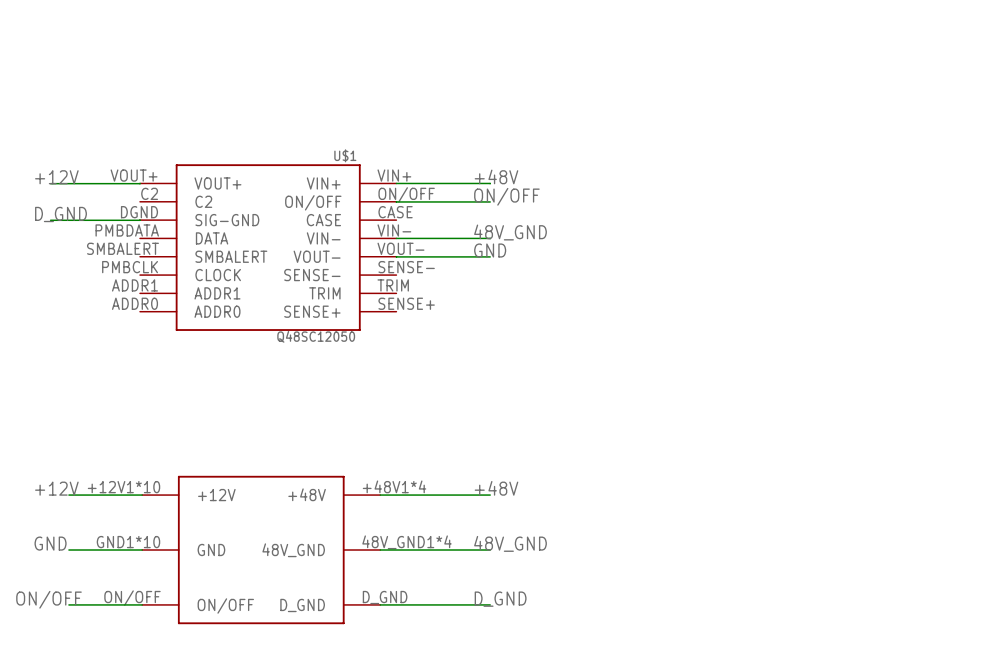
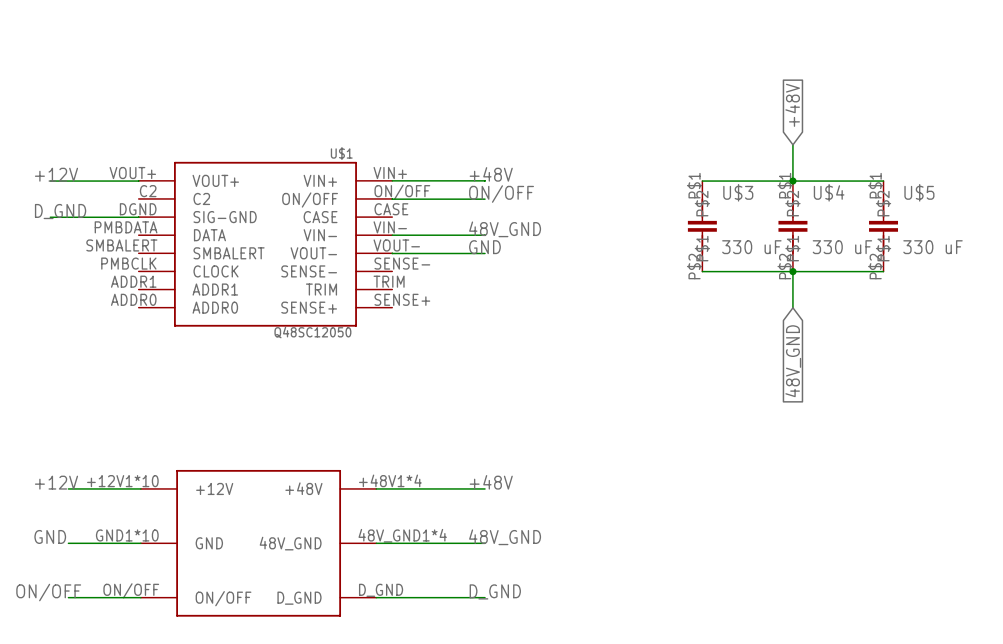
global label: none -> +48V (792, 105)
wire: none -> (792, 144) (792, 181)
wire: none -> (702, 181) (883, 181)
junction: none -> (792, 181)
U$3: none -> 330 uF (702, 226)
U$4: none -> 330 uF (792, 226)
U$5: none -> 330 uF (883, 226)
wire: none -> (702, 271) (883, 271)
wire: none -> (792, 271) (792, 307)
junction: none -> (792, 271)
global label: none -> 48V_GND (793, 361)

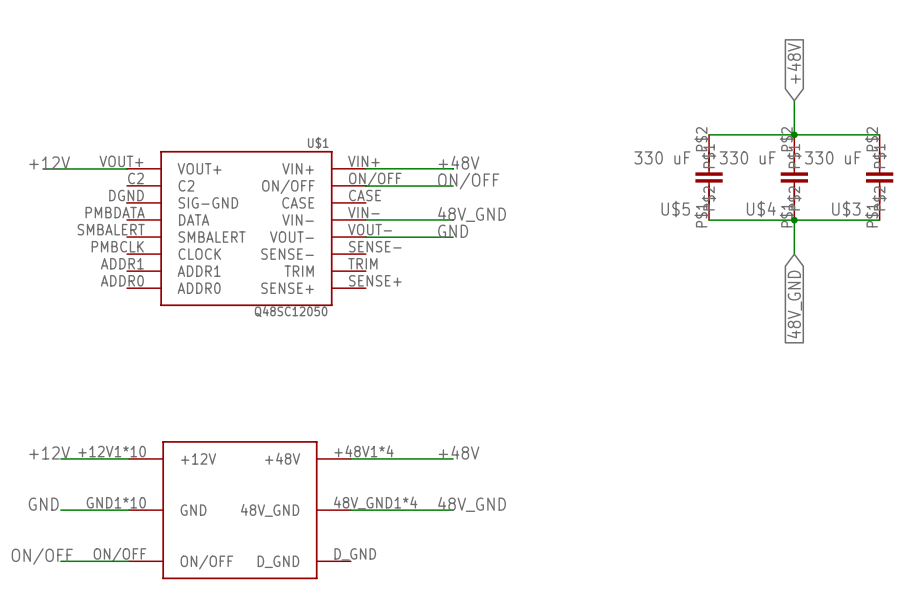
global label position: +48V (792, 105) -> +48V (794, 63)
wire: (792, 144) (792, 181) -> (794, 100) (794, 134)
junction: none -> (794, 134)
wire: (702, 181) (883, 181) -> (709, 134) (879, 134)
junction: (792, 181) -> none
label: D_GND (60, 211) -> none
wire: (50, 217) (138, 217) -> none
U$3 rotation: 0° (702, 226) -> 180° (879, 177)
U$3 position: (702, 226) -> (879, 177)
U$4 rotation: 0° (792, 226) -> 180° (794, 177)
U$4 position: (792, 226) -> (794, 177)
U$5 rotation: 0° (883, 226) -> 180° (709, 177)
U$5 position: (883, 226) -> (709, 177)
junction: none -> (794, 220)
wire: (702, 271) (883, 271) -> (709, 220) (879, 220)
wire: (792, 271) (792, 307) -> (794, 220) (794, 254)
junction: (792, 271) -> none
global label position: 48V_GND (793, 361) -> 48V_GND (794, 304)
label: D_GND (495, 591) -> none
wire: (376, 597) (485, 597) -> none

